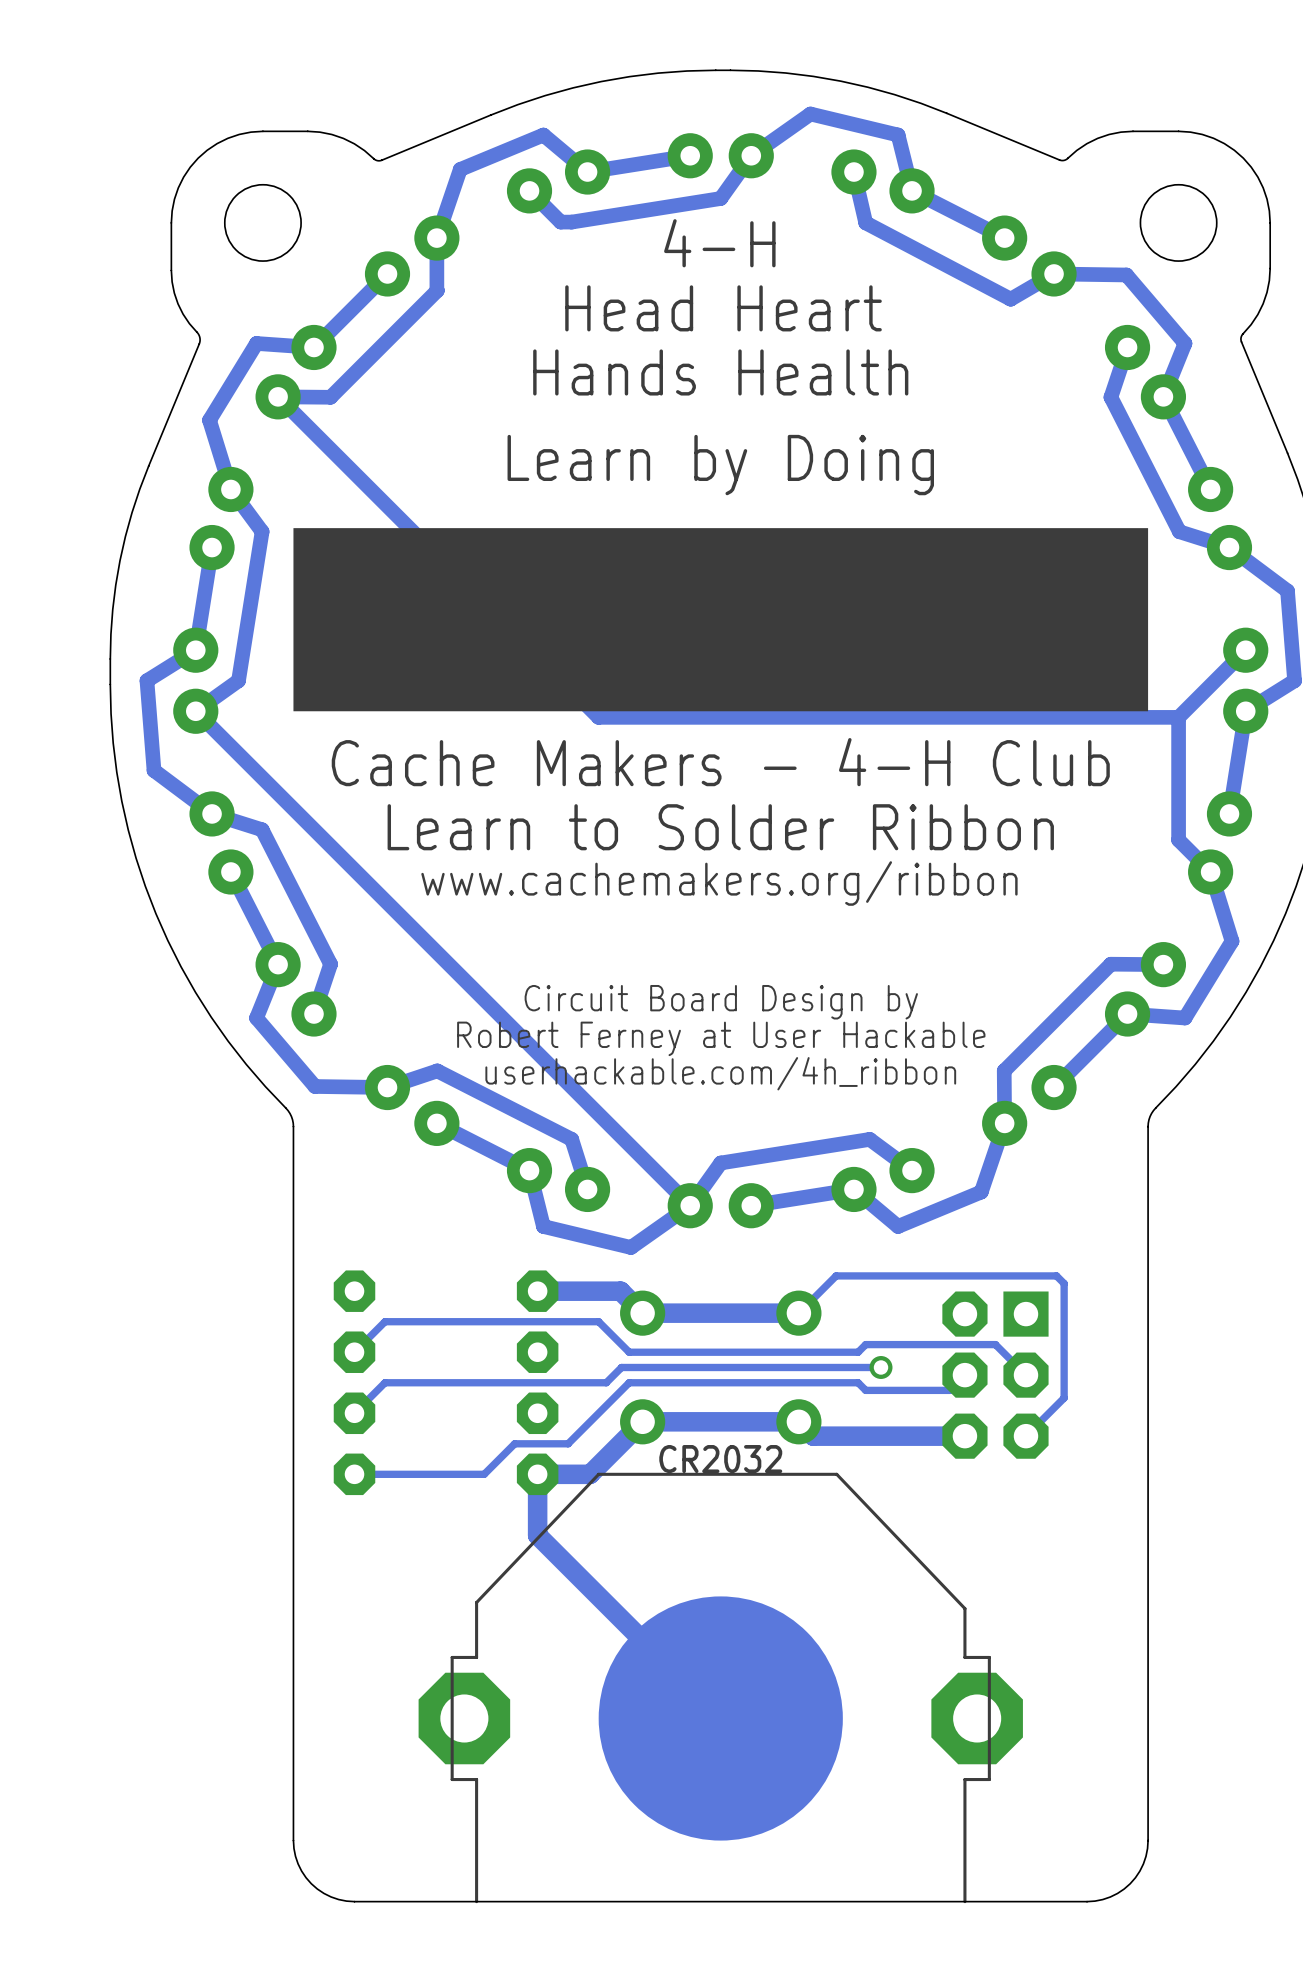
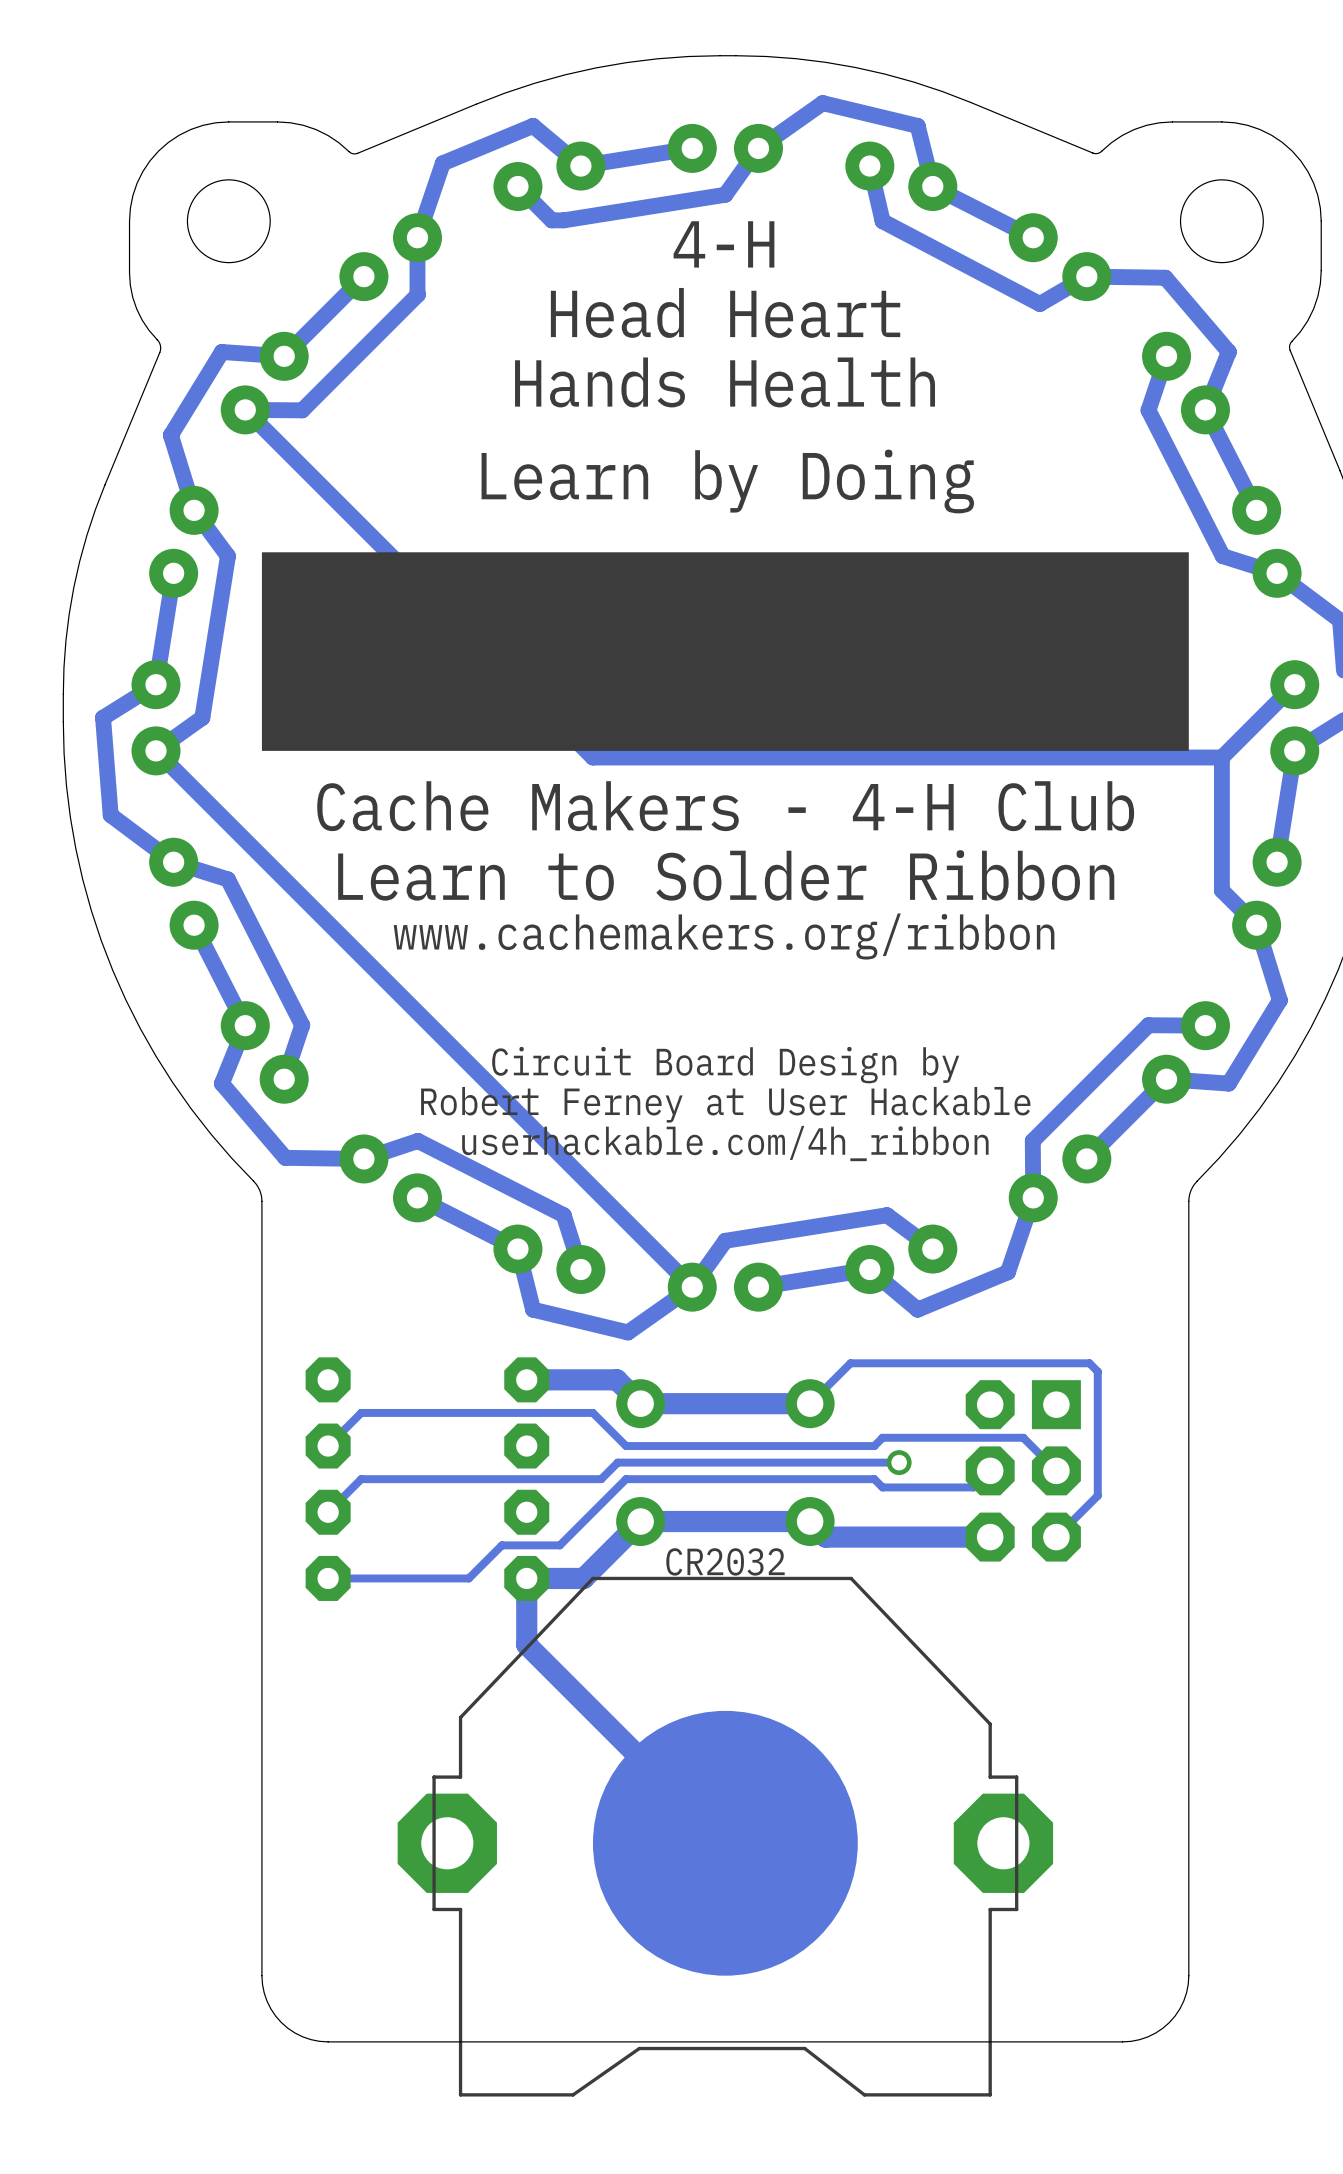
part: (720, 1687) -> none
part: none -> (725, 1836)

